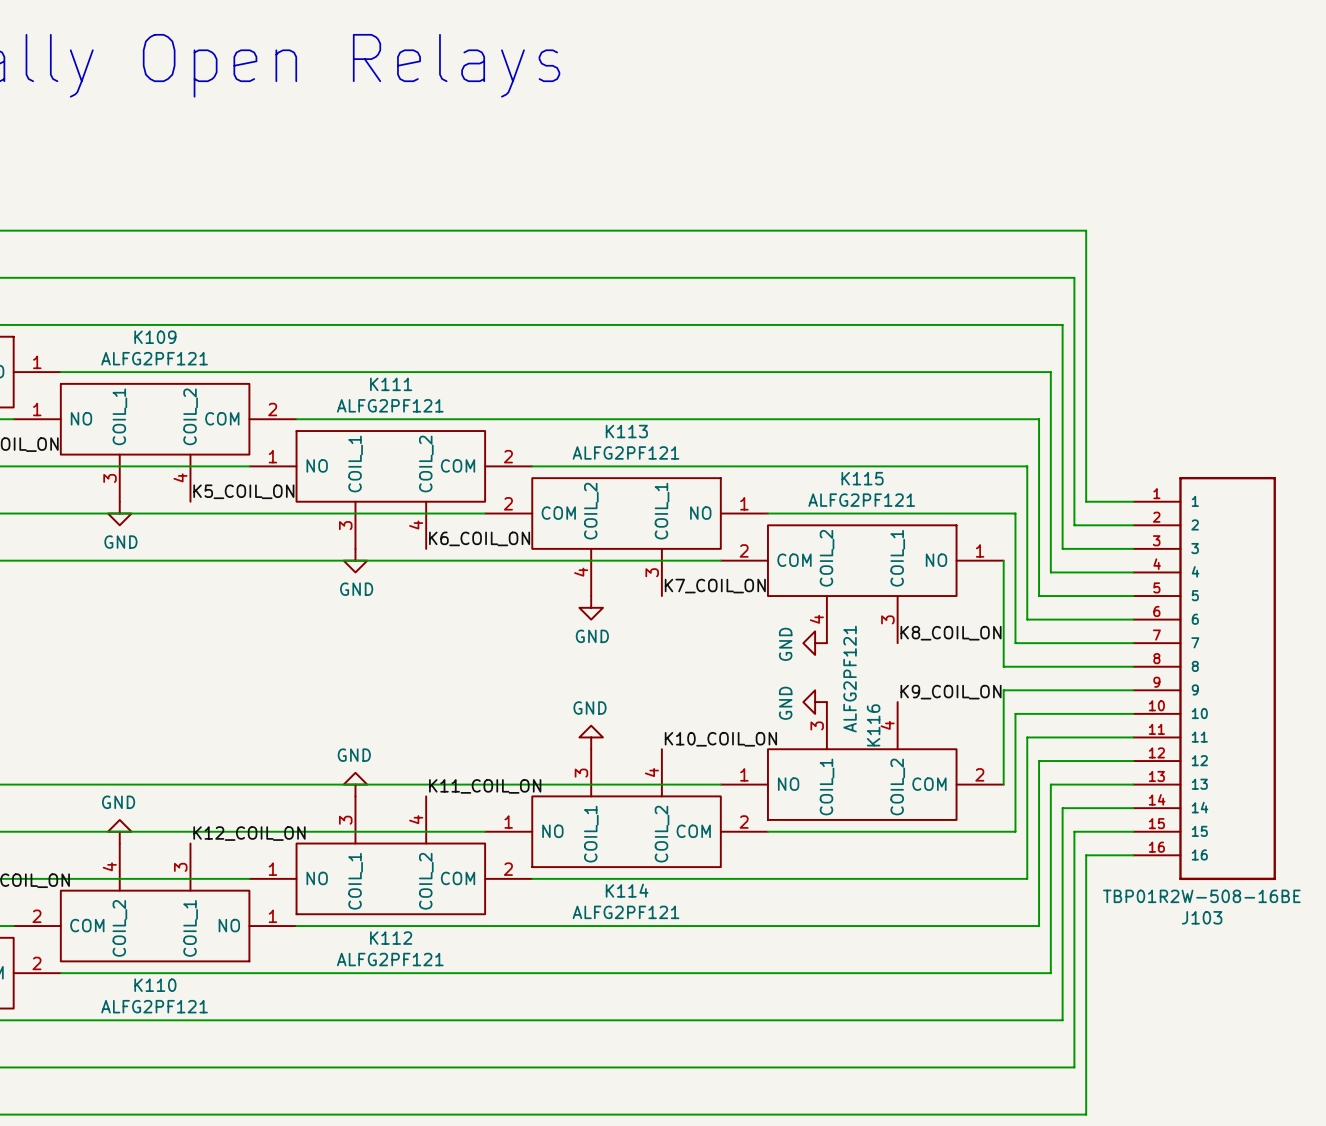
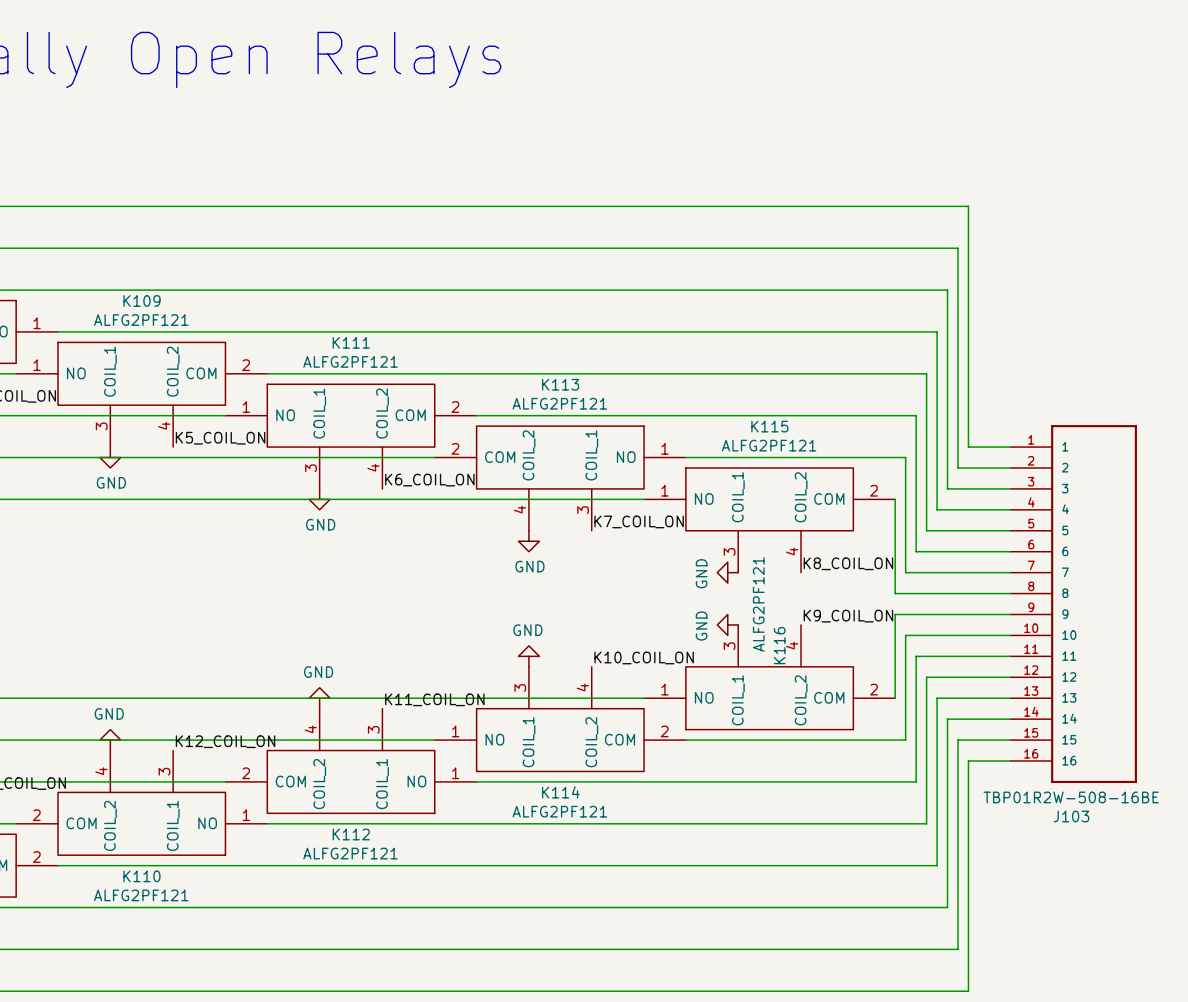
K115 flip: as is (862, 560) -> left-right (769, 499)
K112 flip: as is (390, 878) -> left-right (351, 781)

